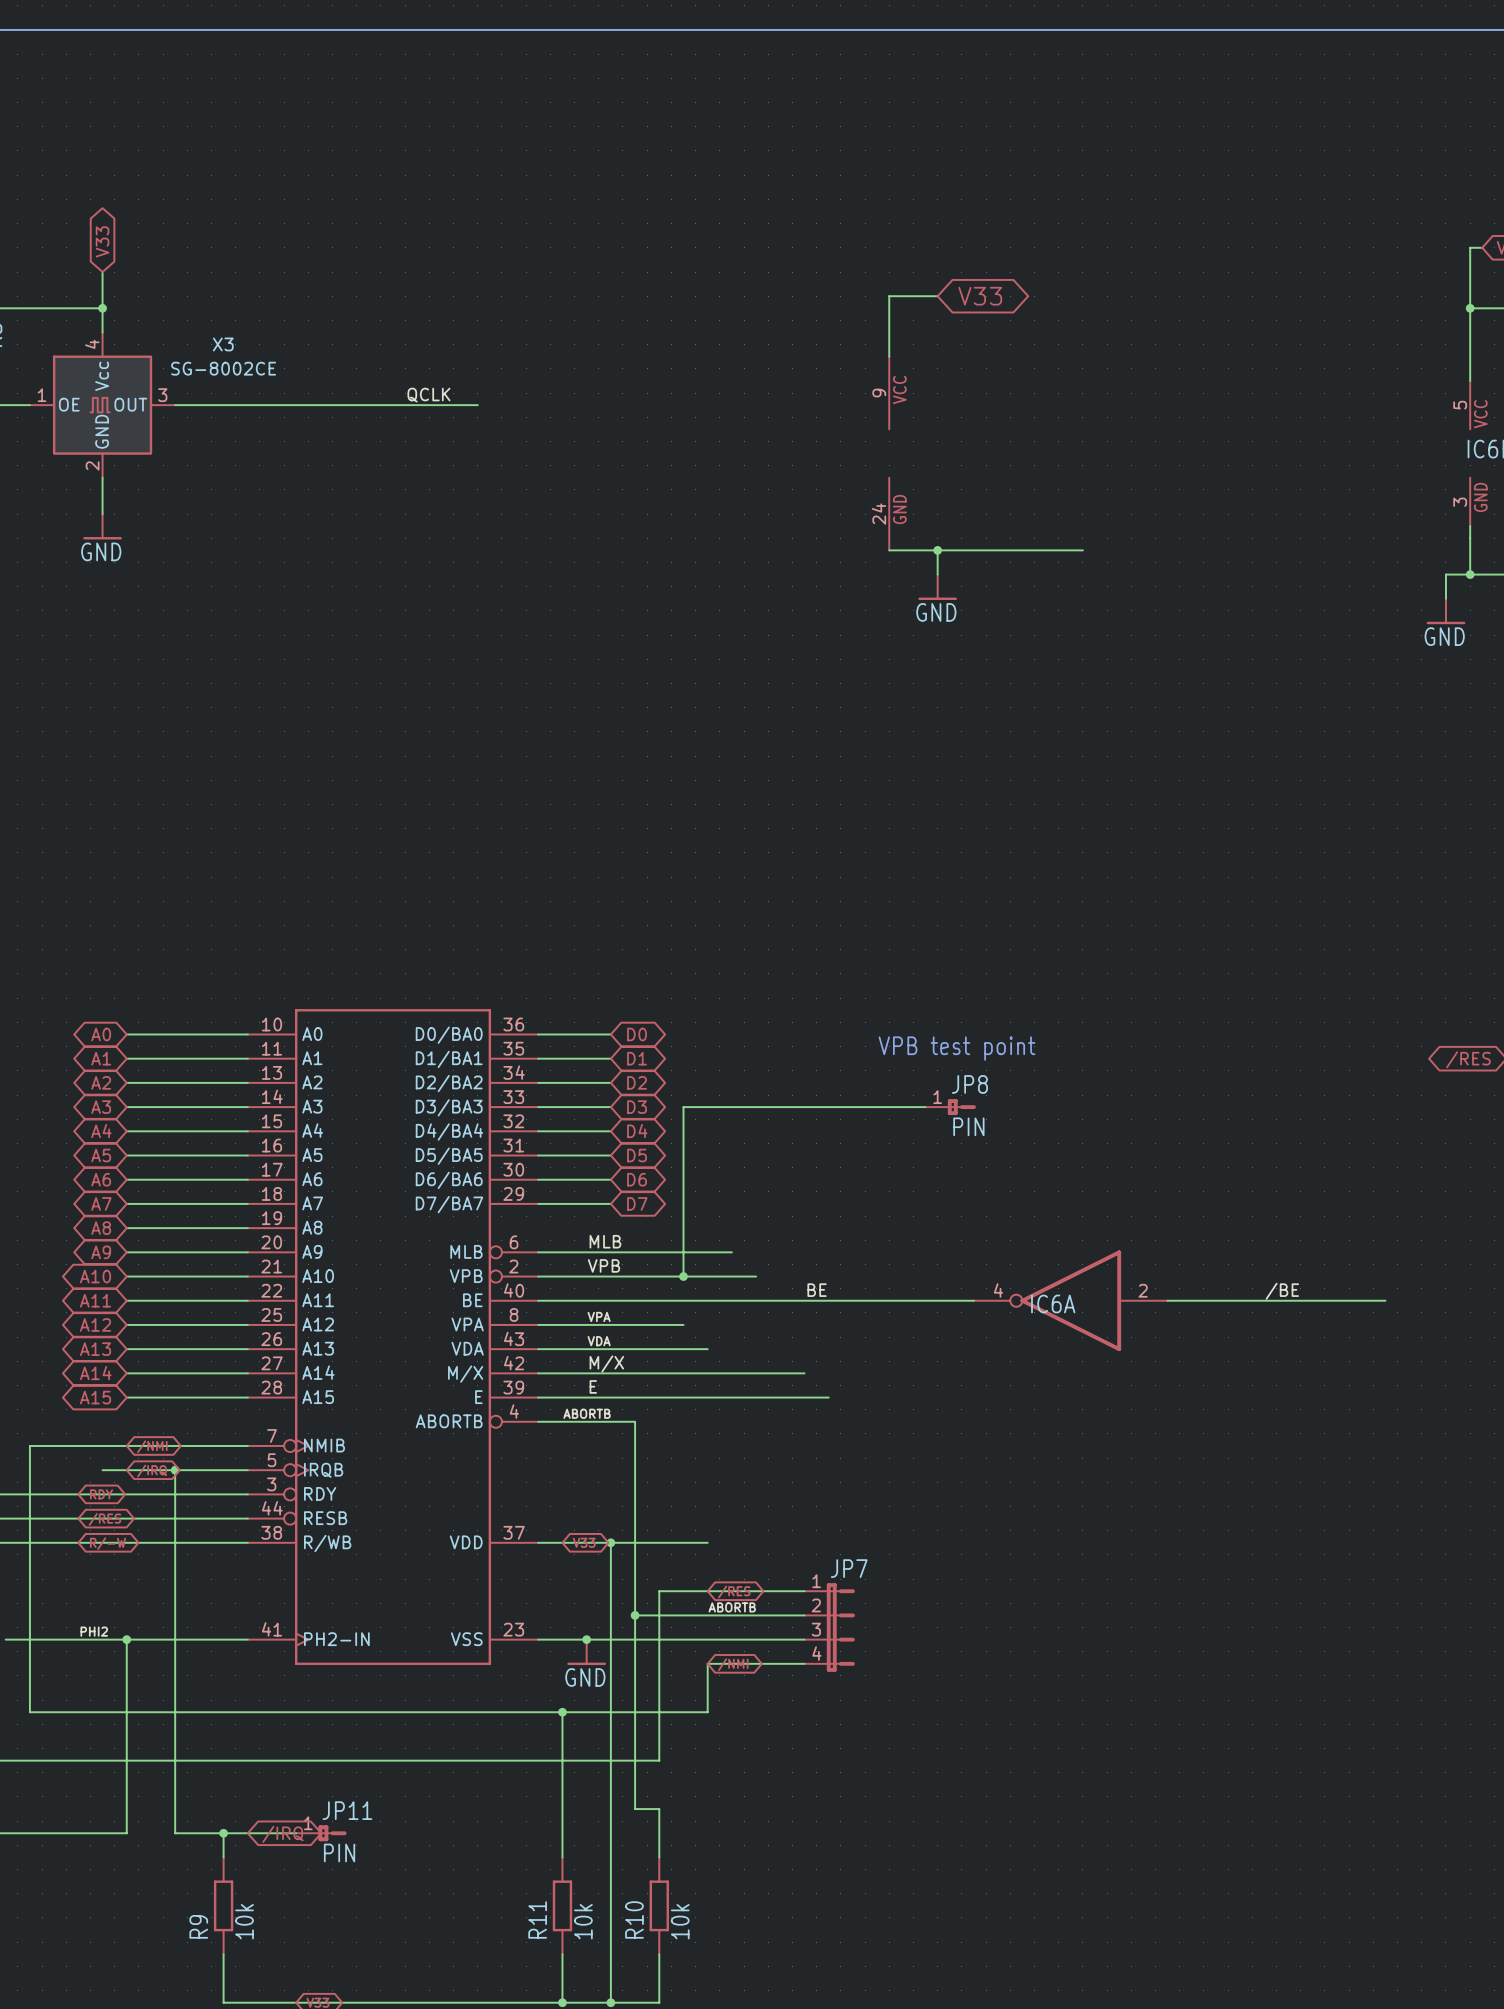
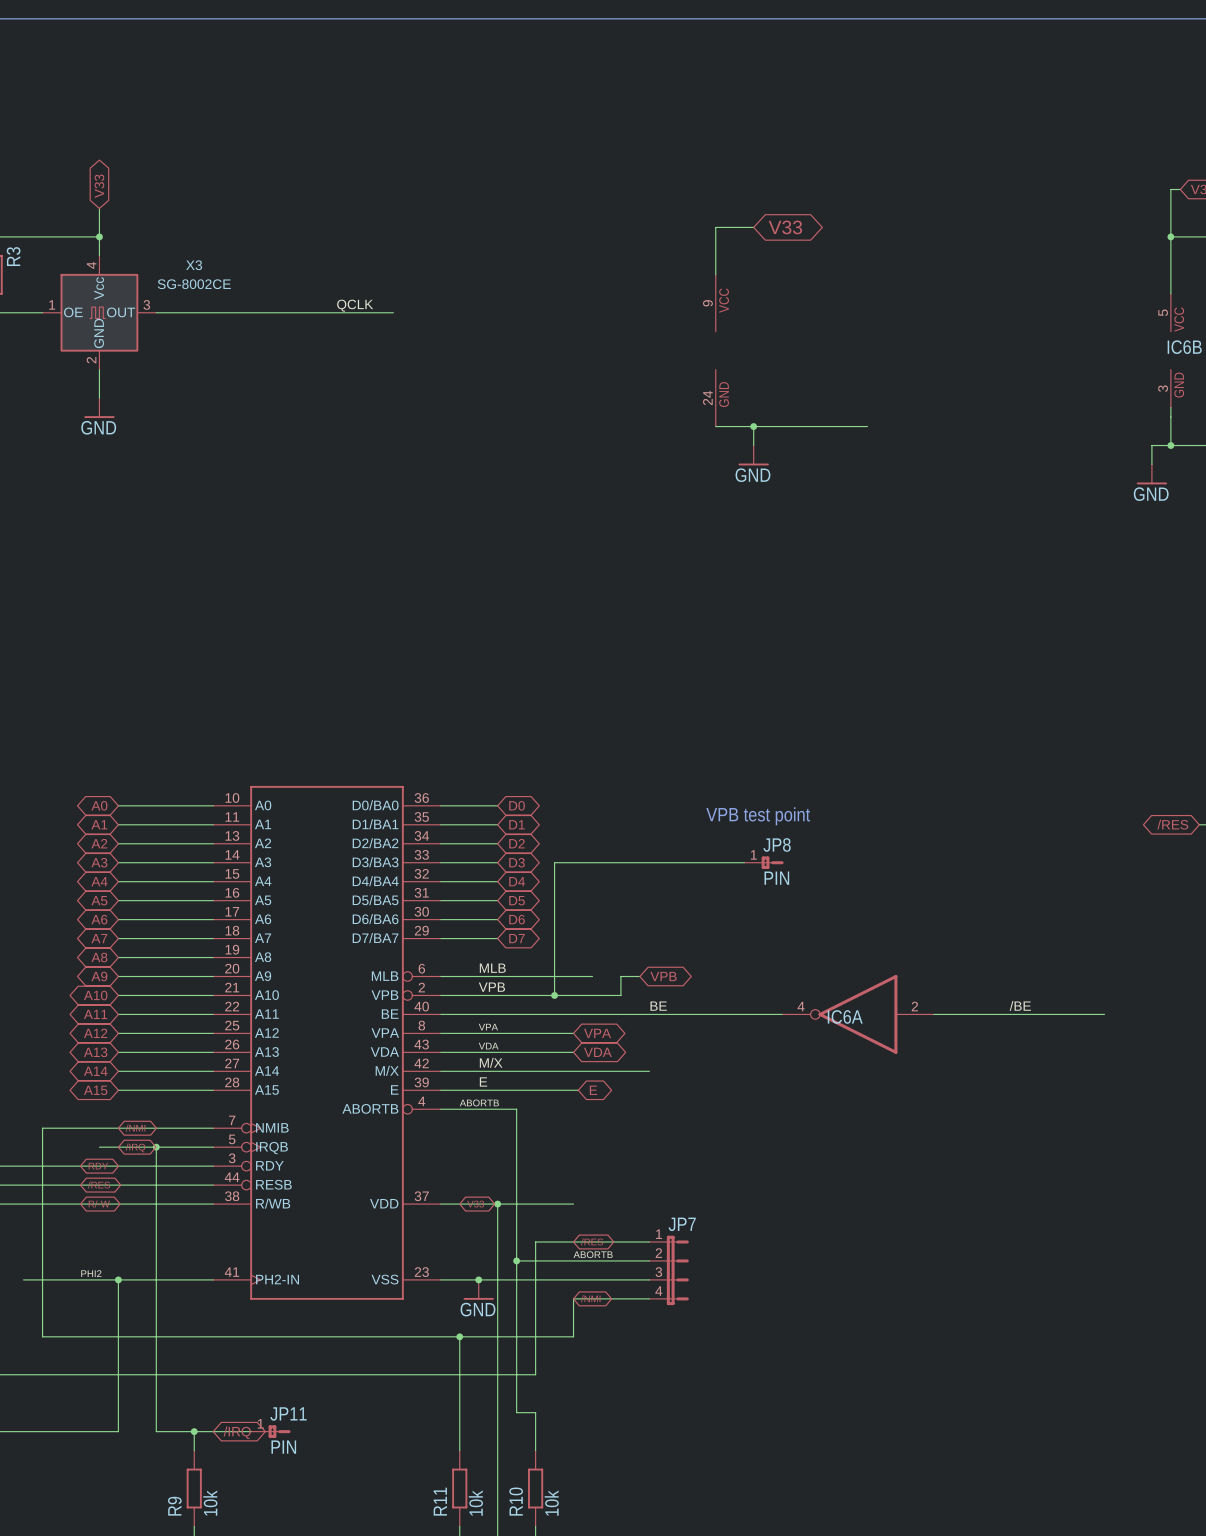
wire: none -> (639, 976) (620, 976) (620, 995) (611, 995)
global label: none -> VPB (663, 976)
wire: none -> (554, 1033) (573, 1033)
global label: none -> VPA (597, 1033)
global label: none -> VDA (597, 1052)
wire: (713, 1397) (828, 1397) -> none
global label: none -> E (593, 1090)

